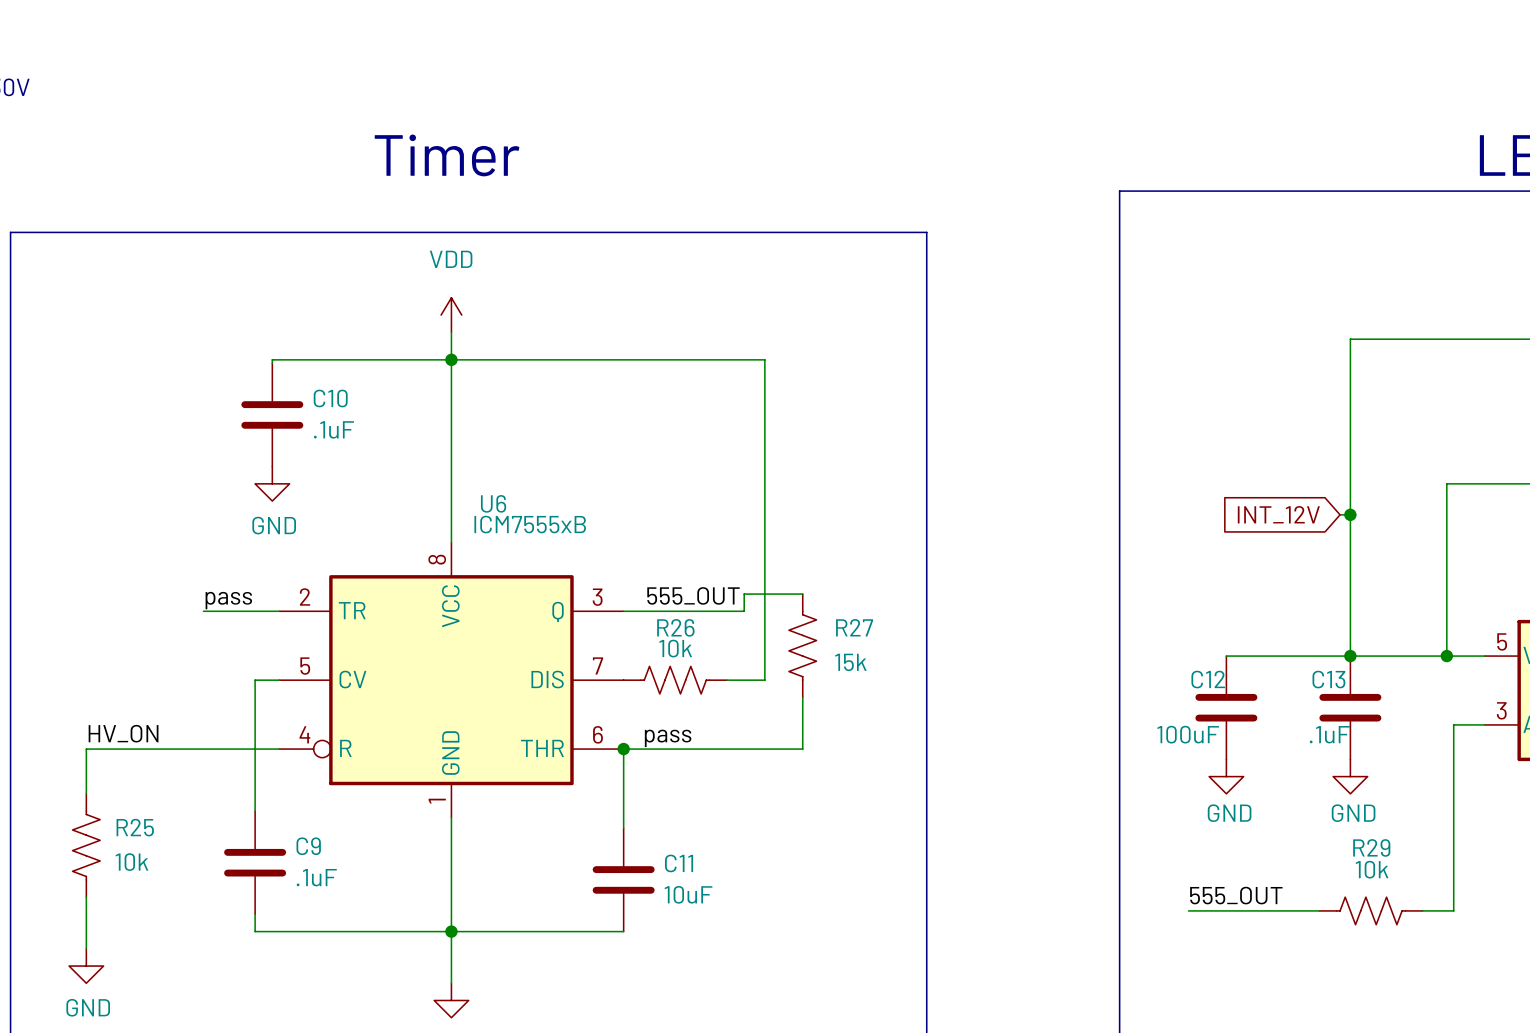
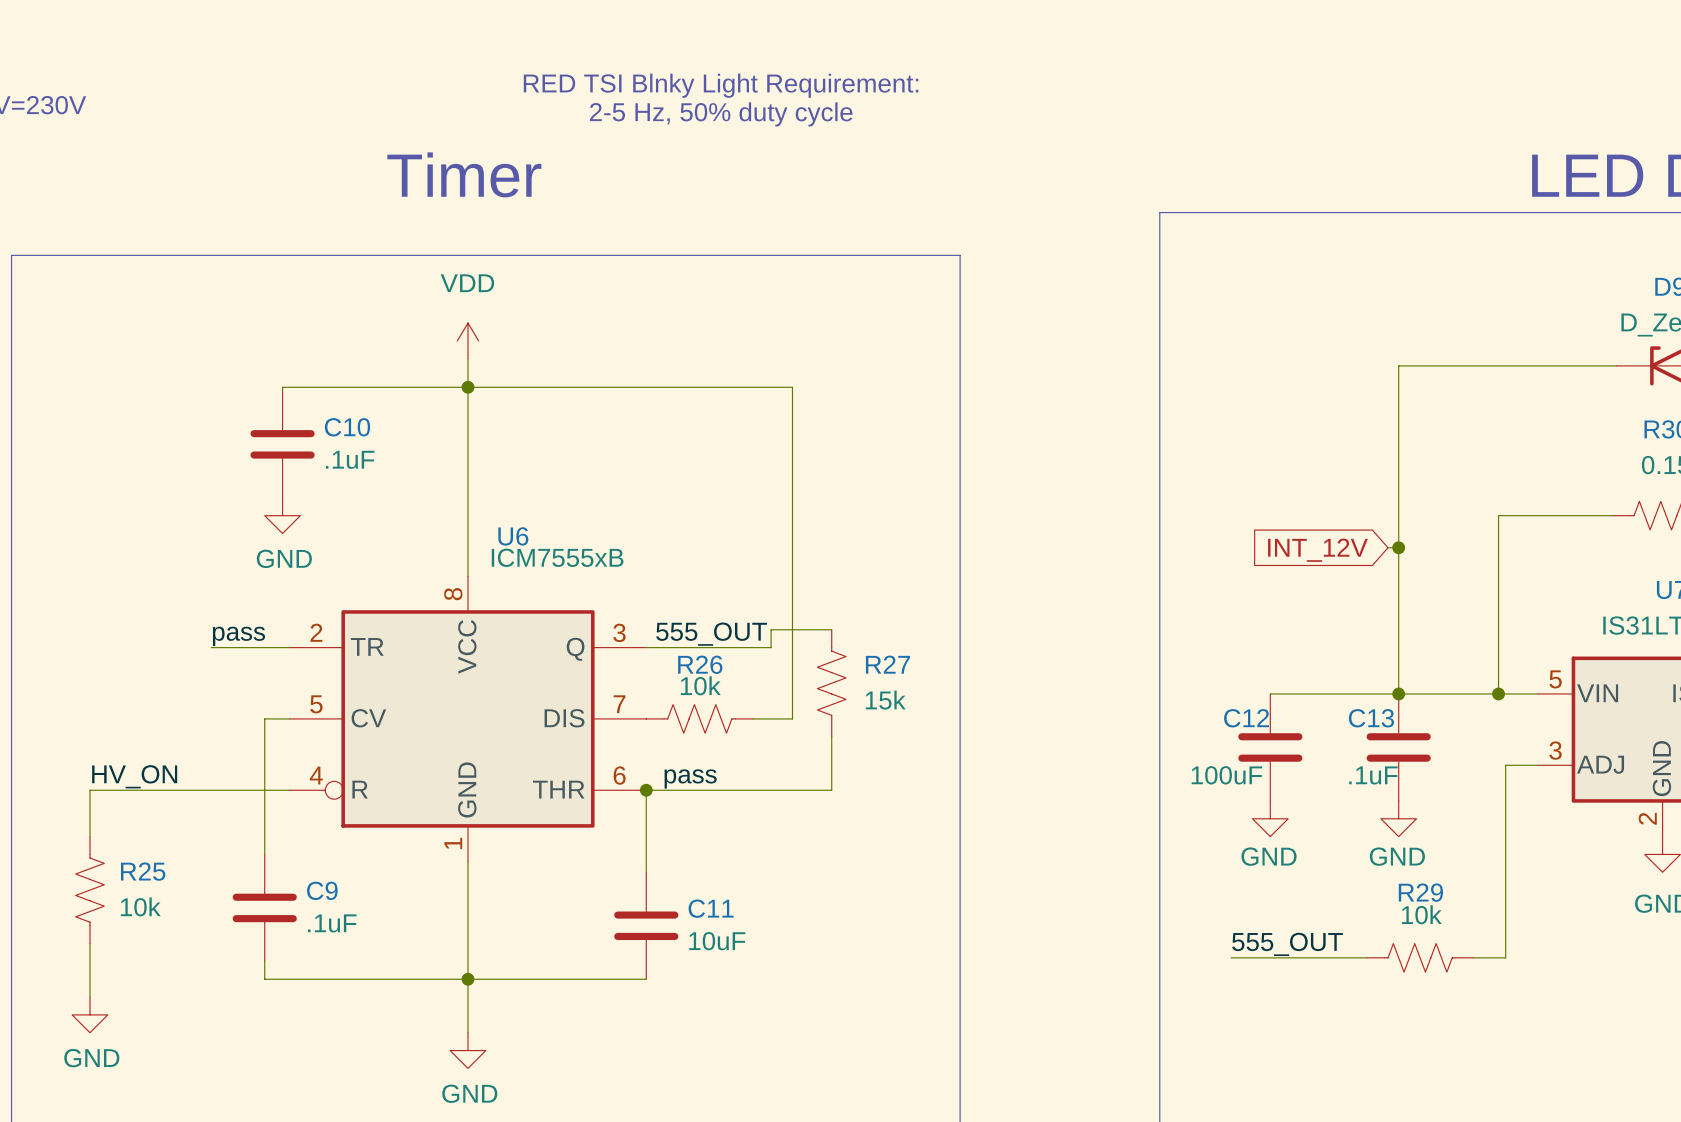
text: none -> RED TSI Blnky Light Requirement: (721, 85)
text: none -> 2-5 Hz, 50% duty cycle (721, 114)

